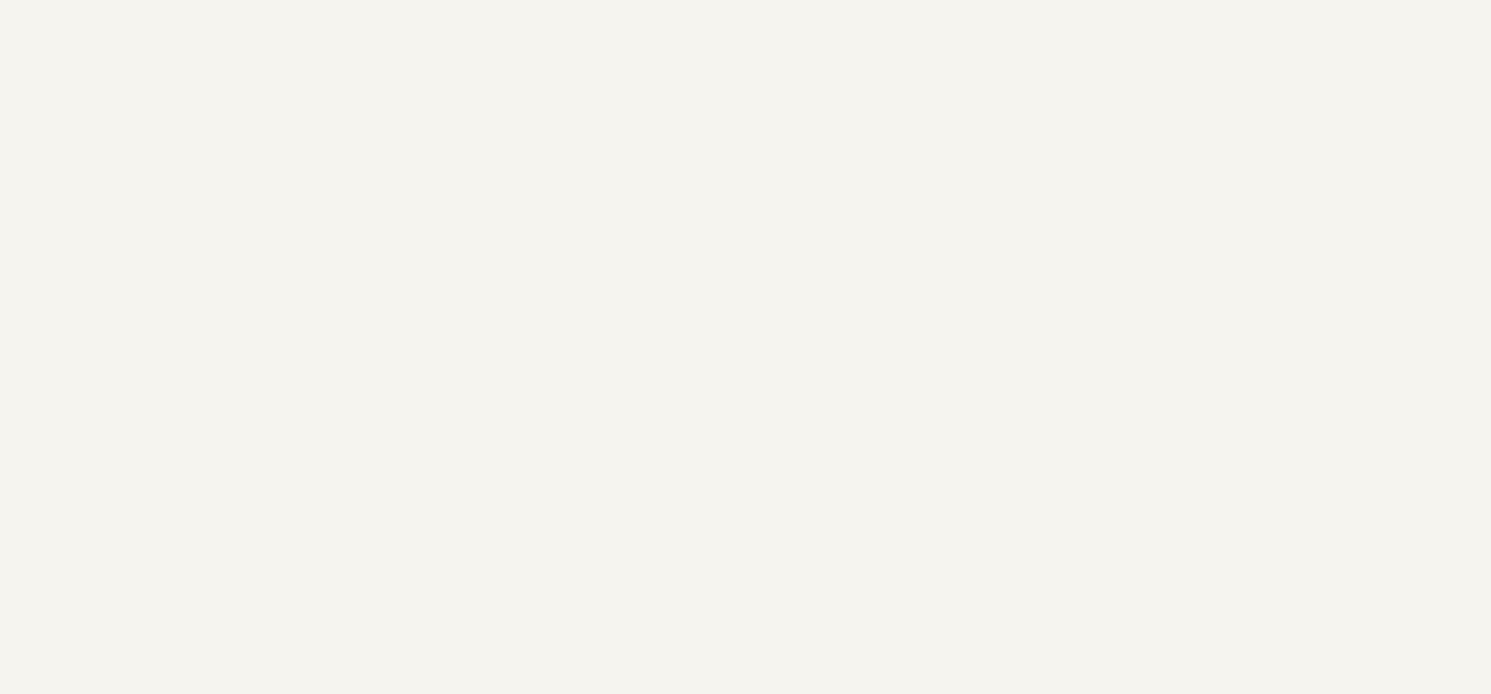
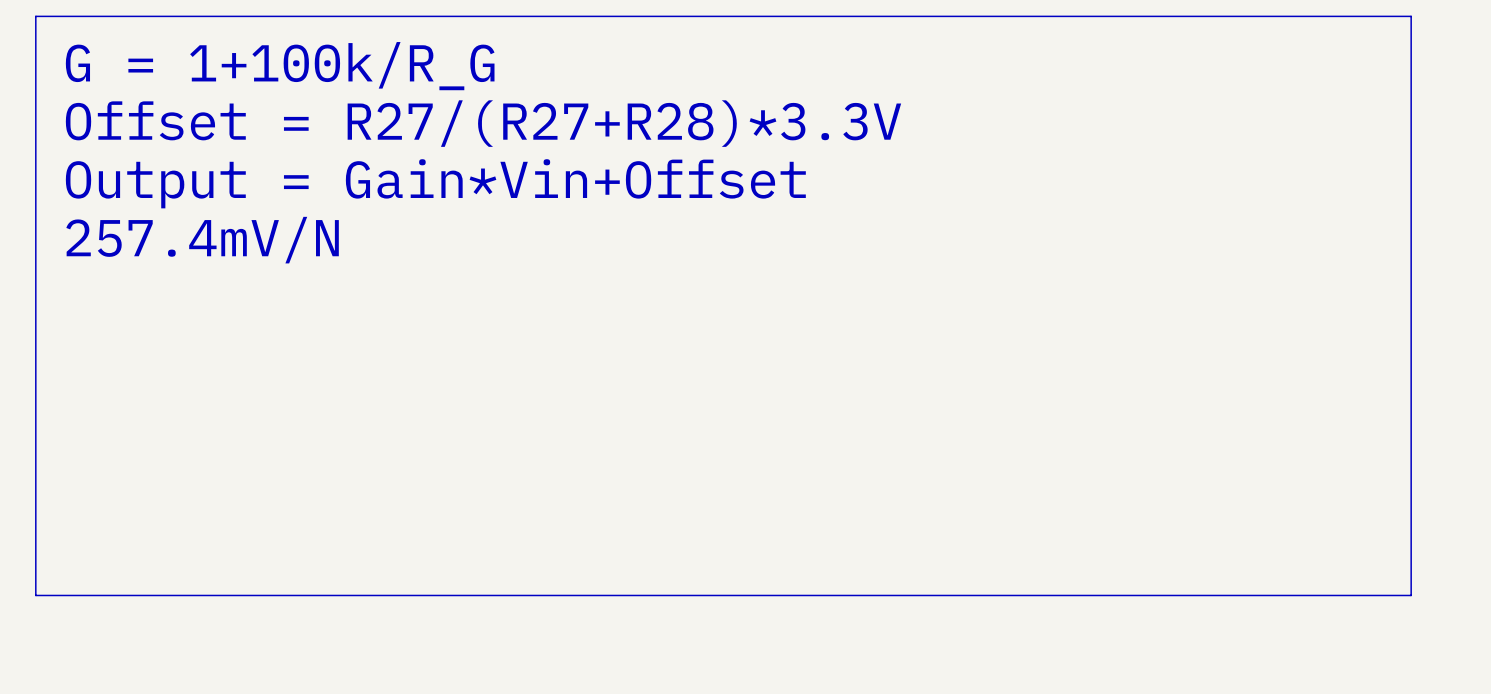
line: none -> (35, 16) (1411, 16) (1411, 595) (35, 595) (35, 16)
text: none -> G = 1+100k/R_G (280, 66)
text: none -> Offset = R27/(R27+R28)*3.3V (483, 123)
text: none -> Output = Gain*Vin+Offset (435, 183)
text: none -> 257.4mV/N (202, 240)

